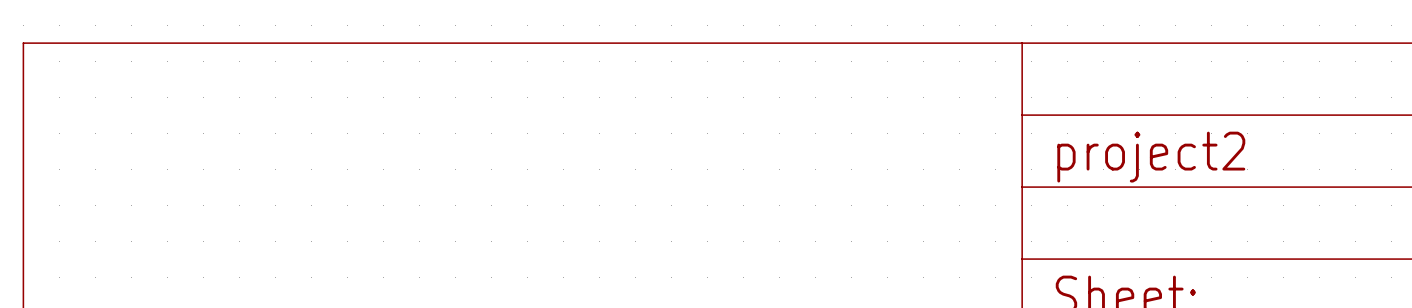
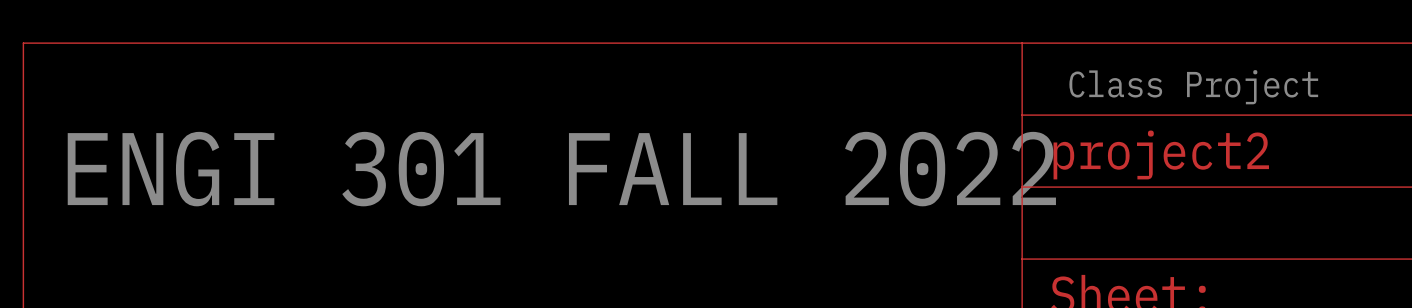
text: none -> Class Project (1193, 87)
text: none -> ENGI 301 FALL 2022 (561, 169)

